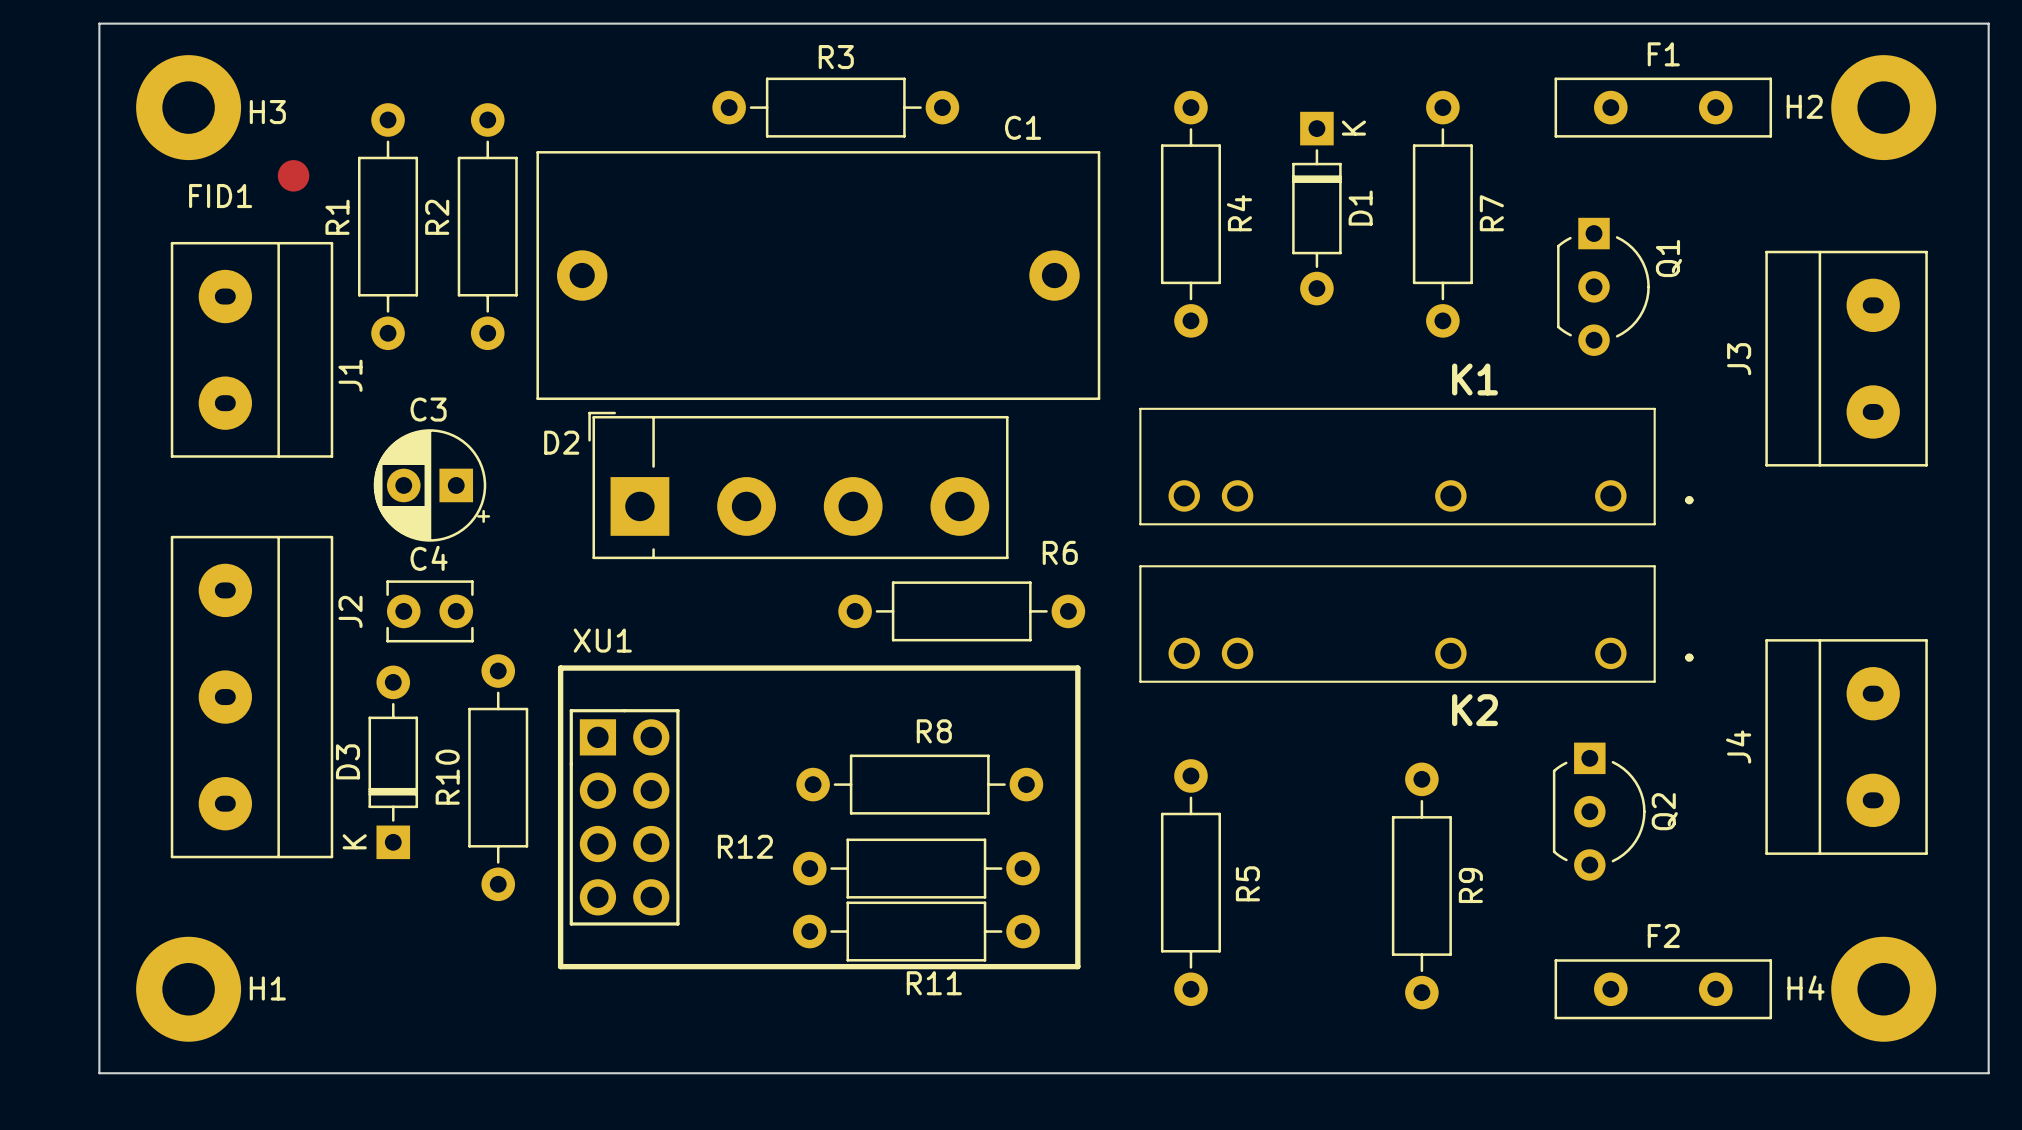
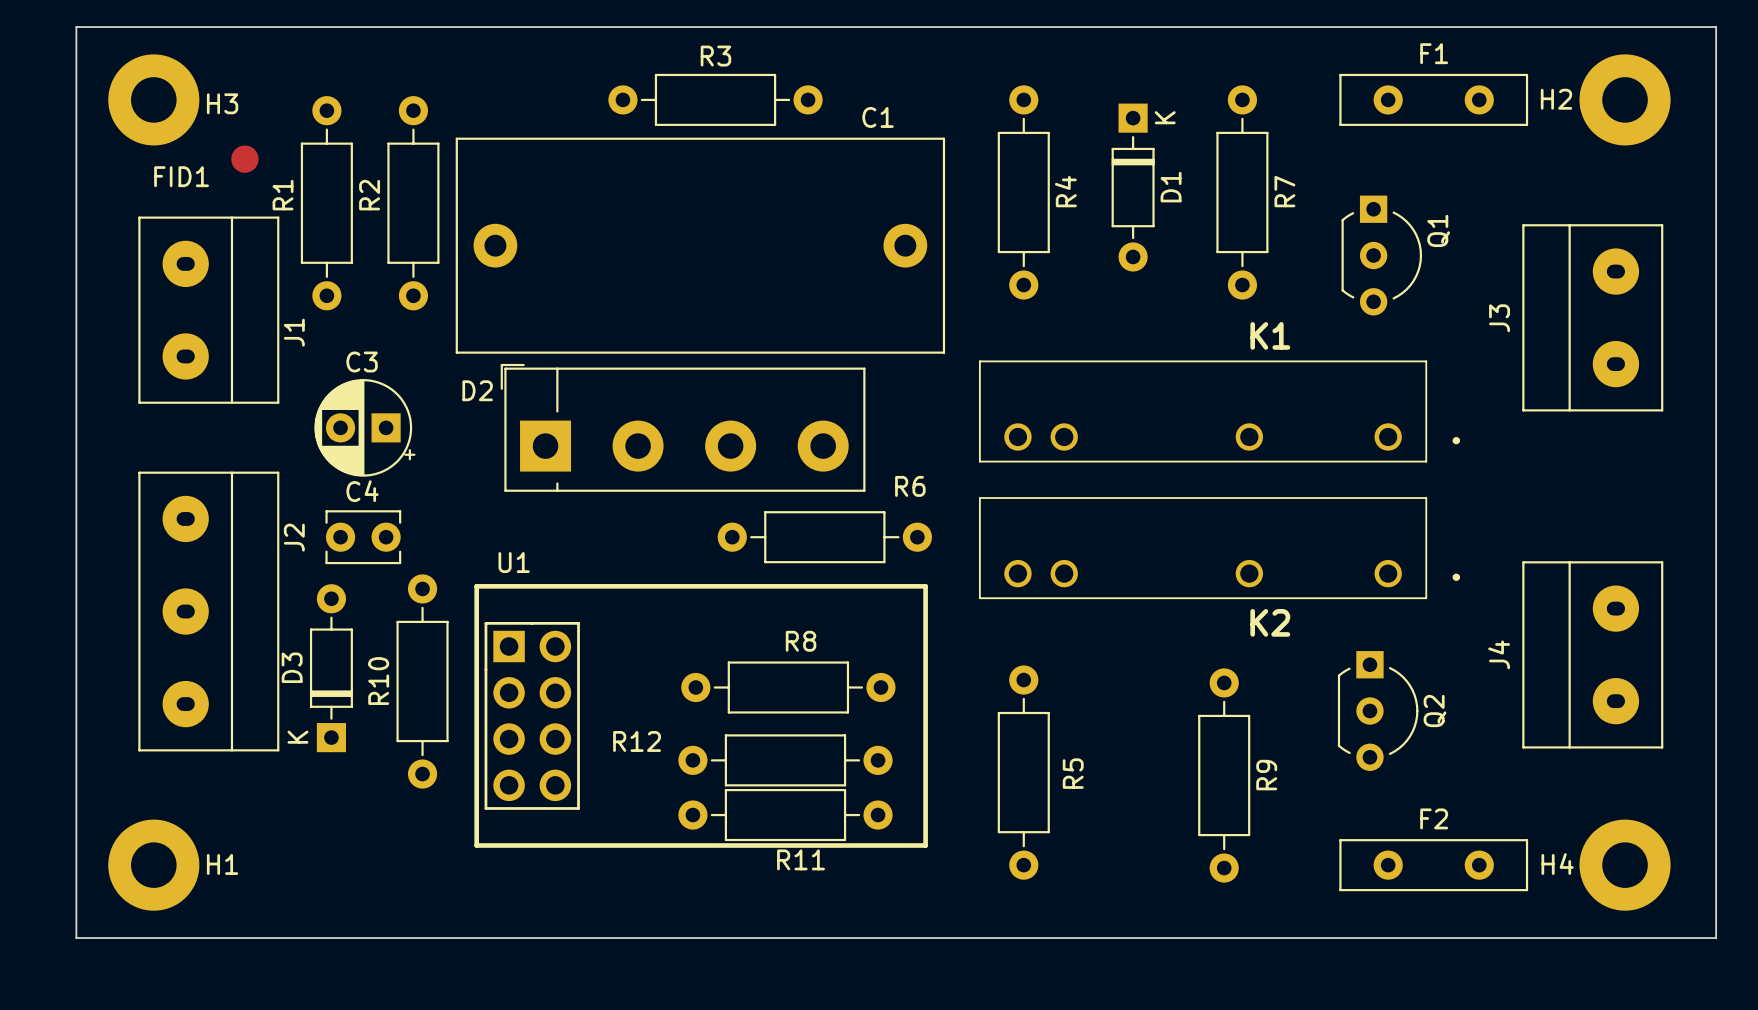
XU1 name: XU1 (602, 640) -> U1 (514, 562)

